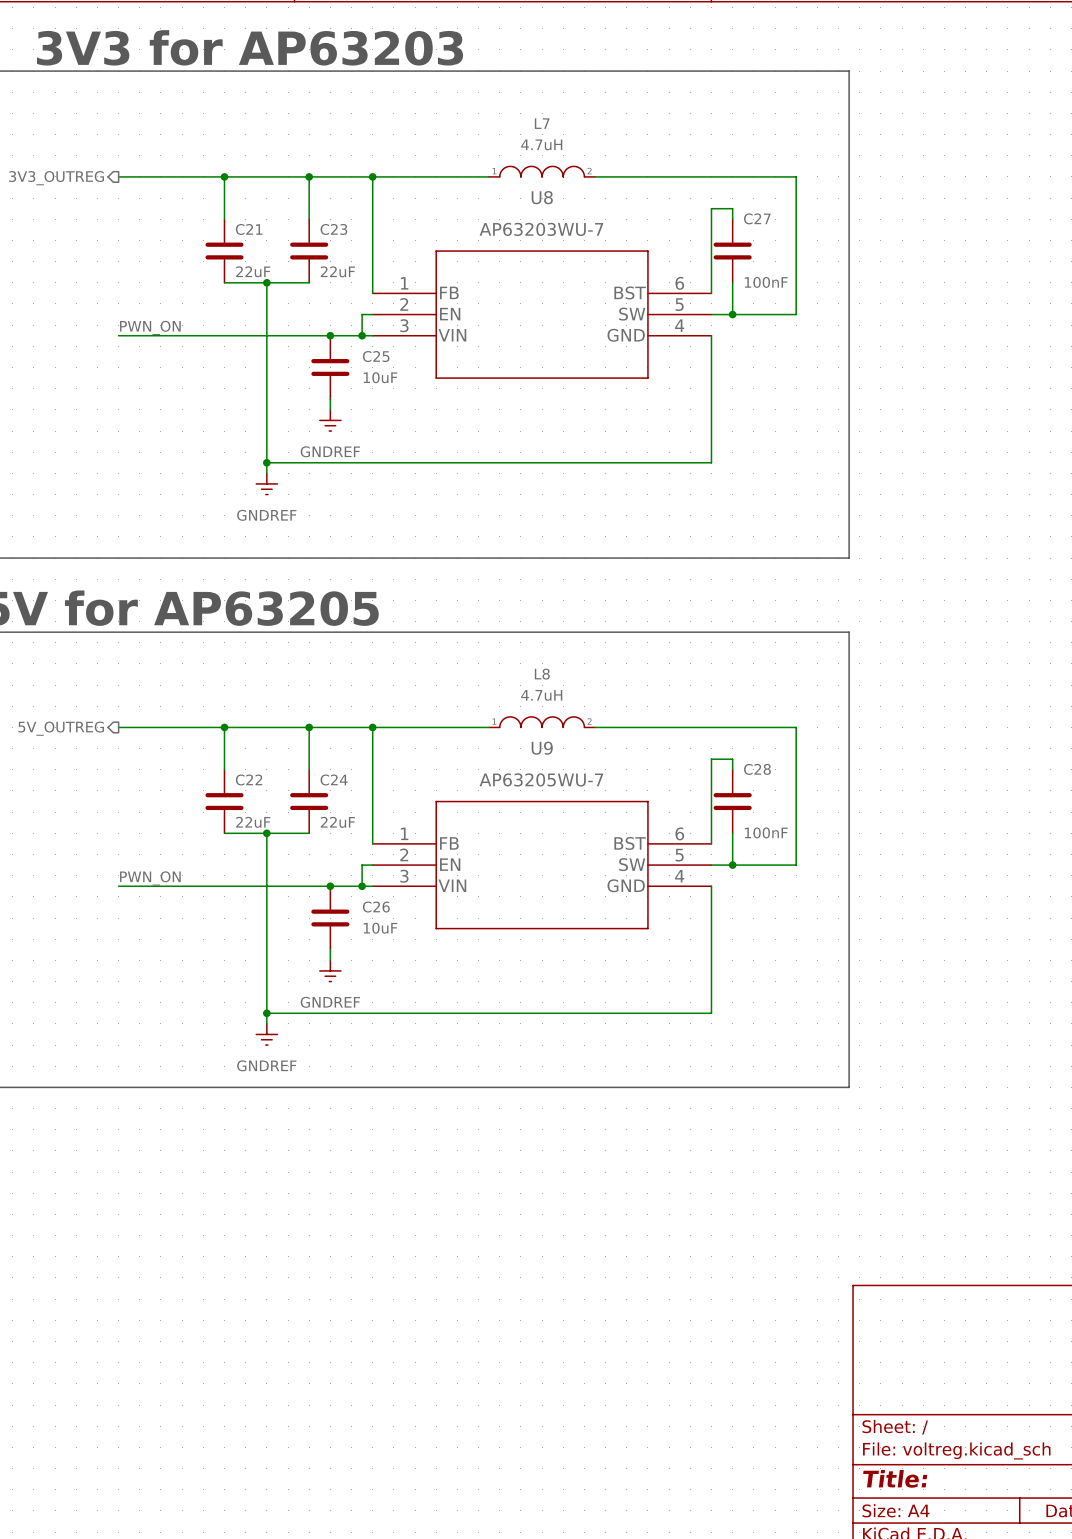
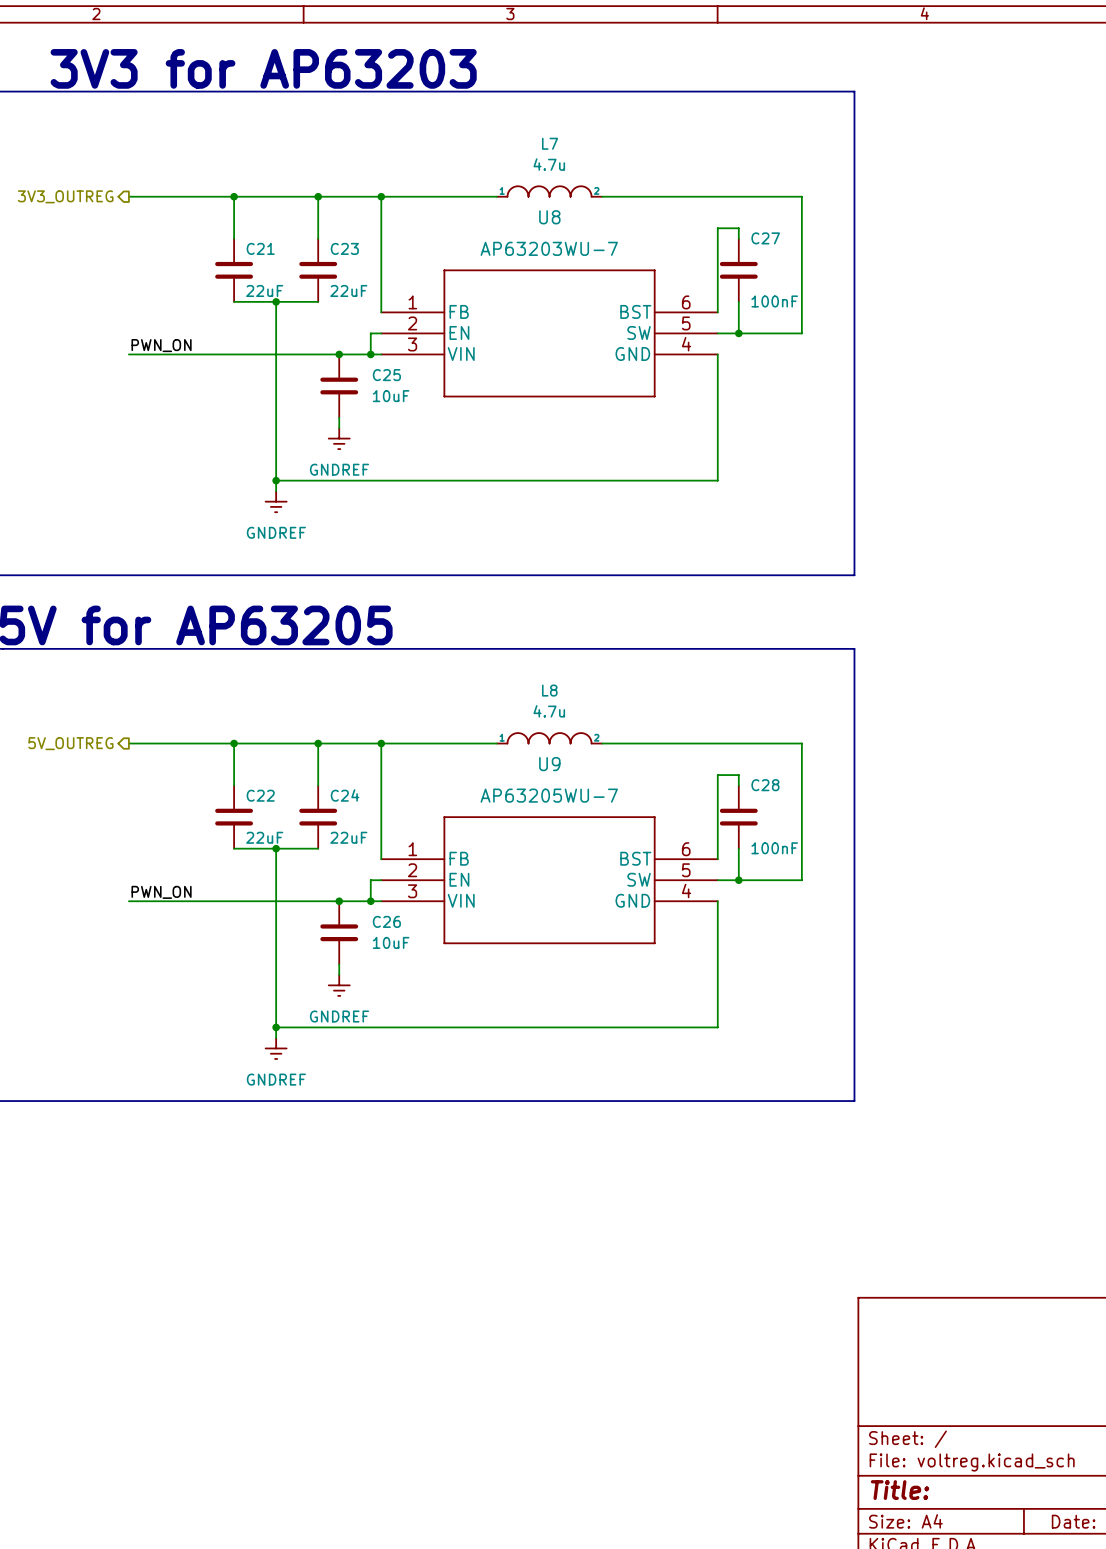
L7 value: 4.7uH (541, 144) -> 4.7u (549, 164)
L8 value: 4.7uH (541, 695) -> 4.7u (549, 711)

